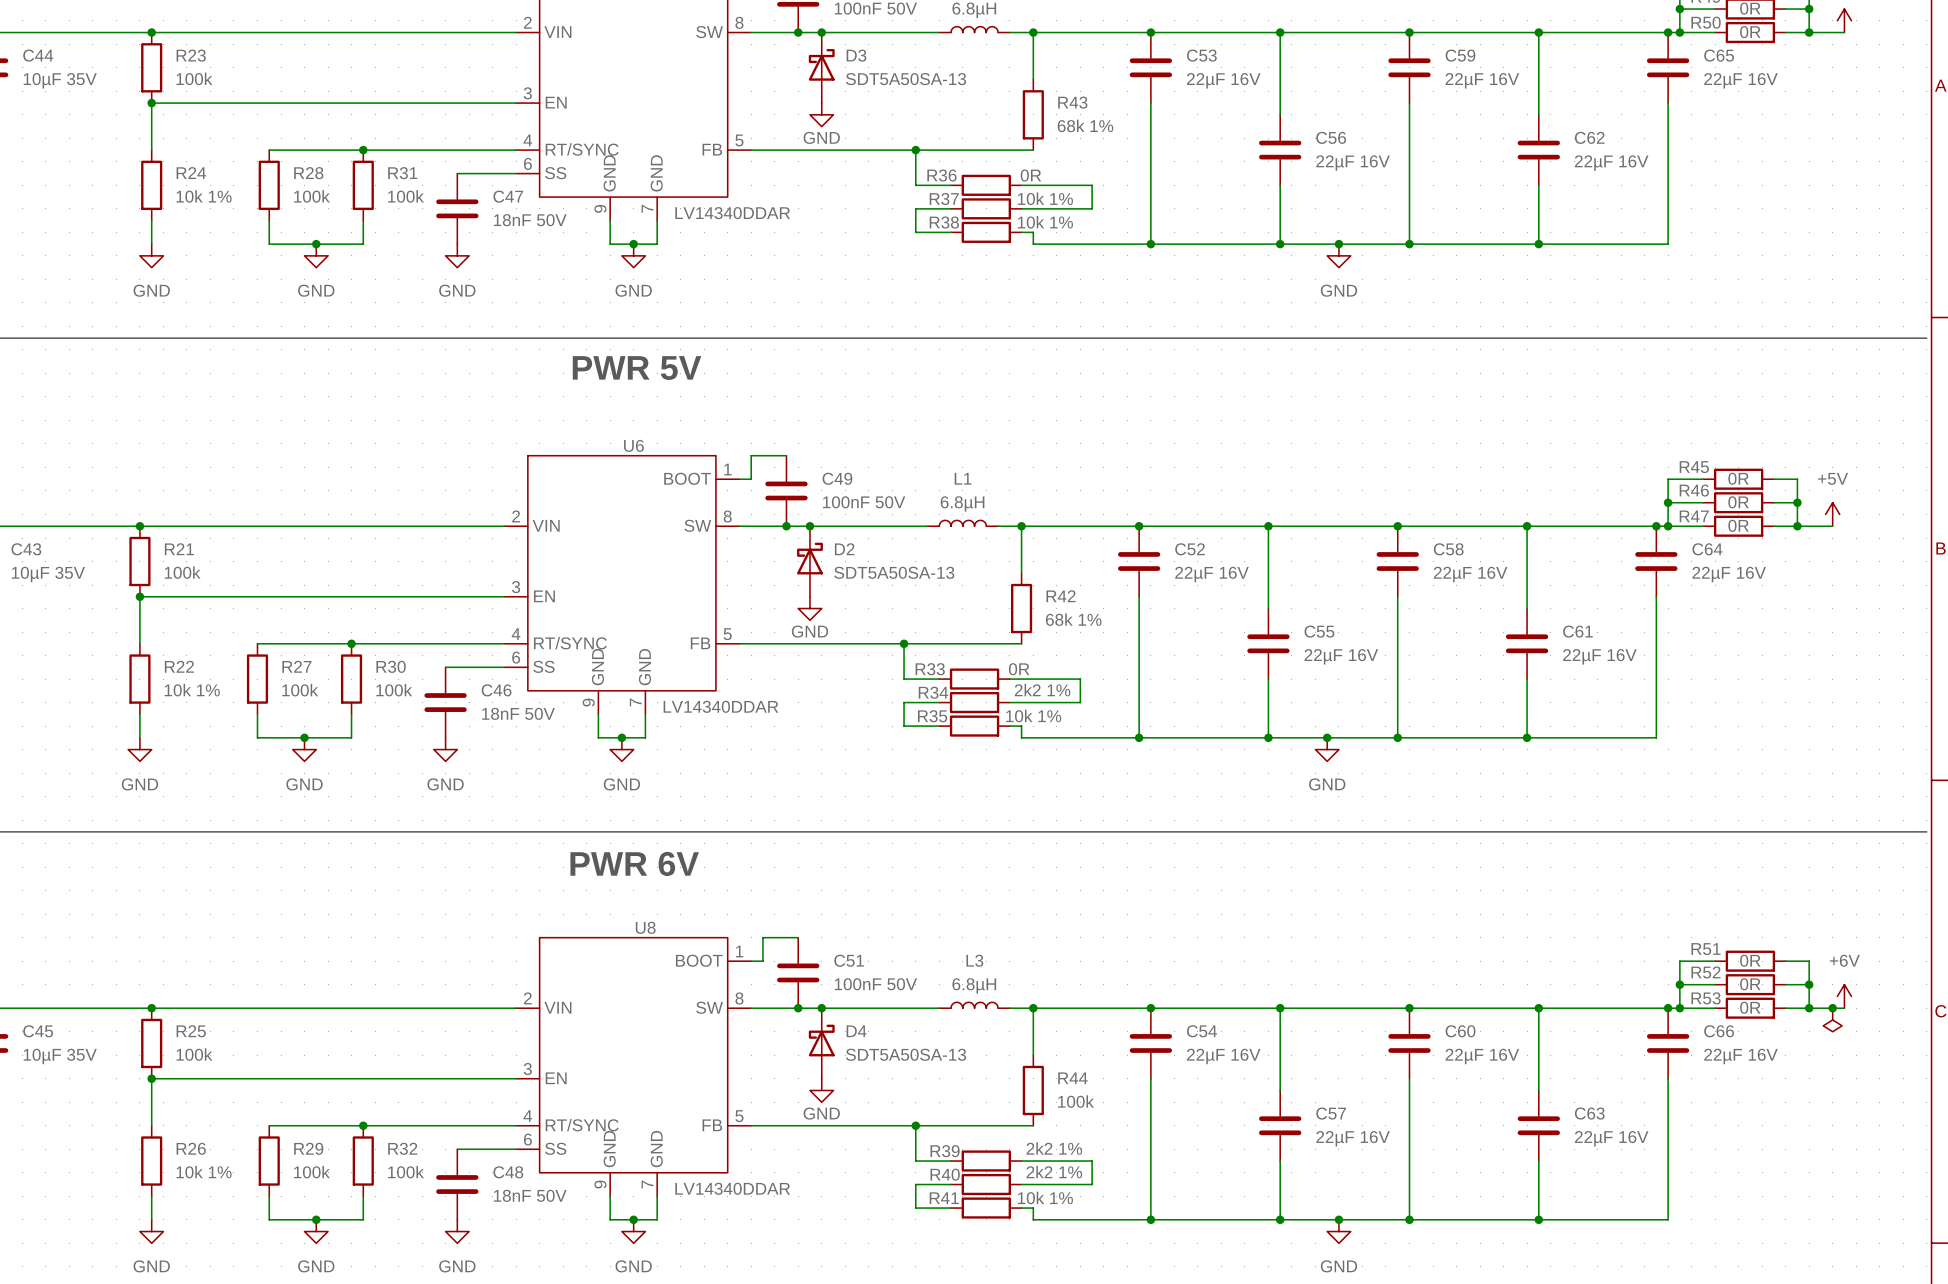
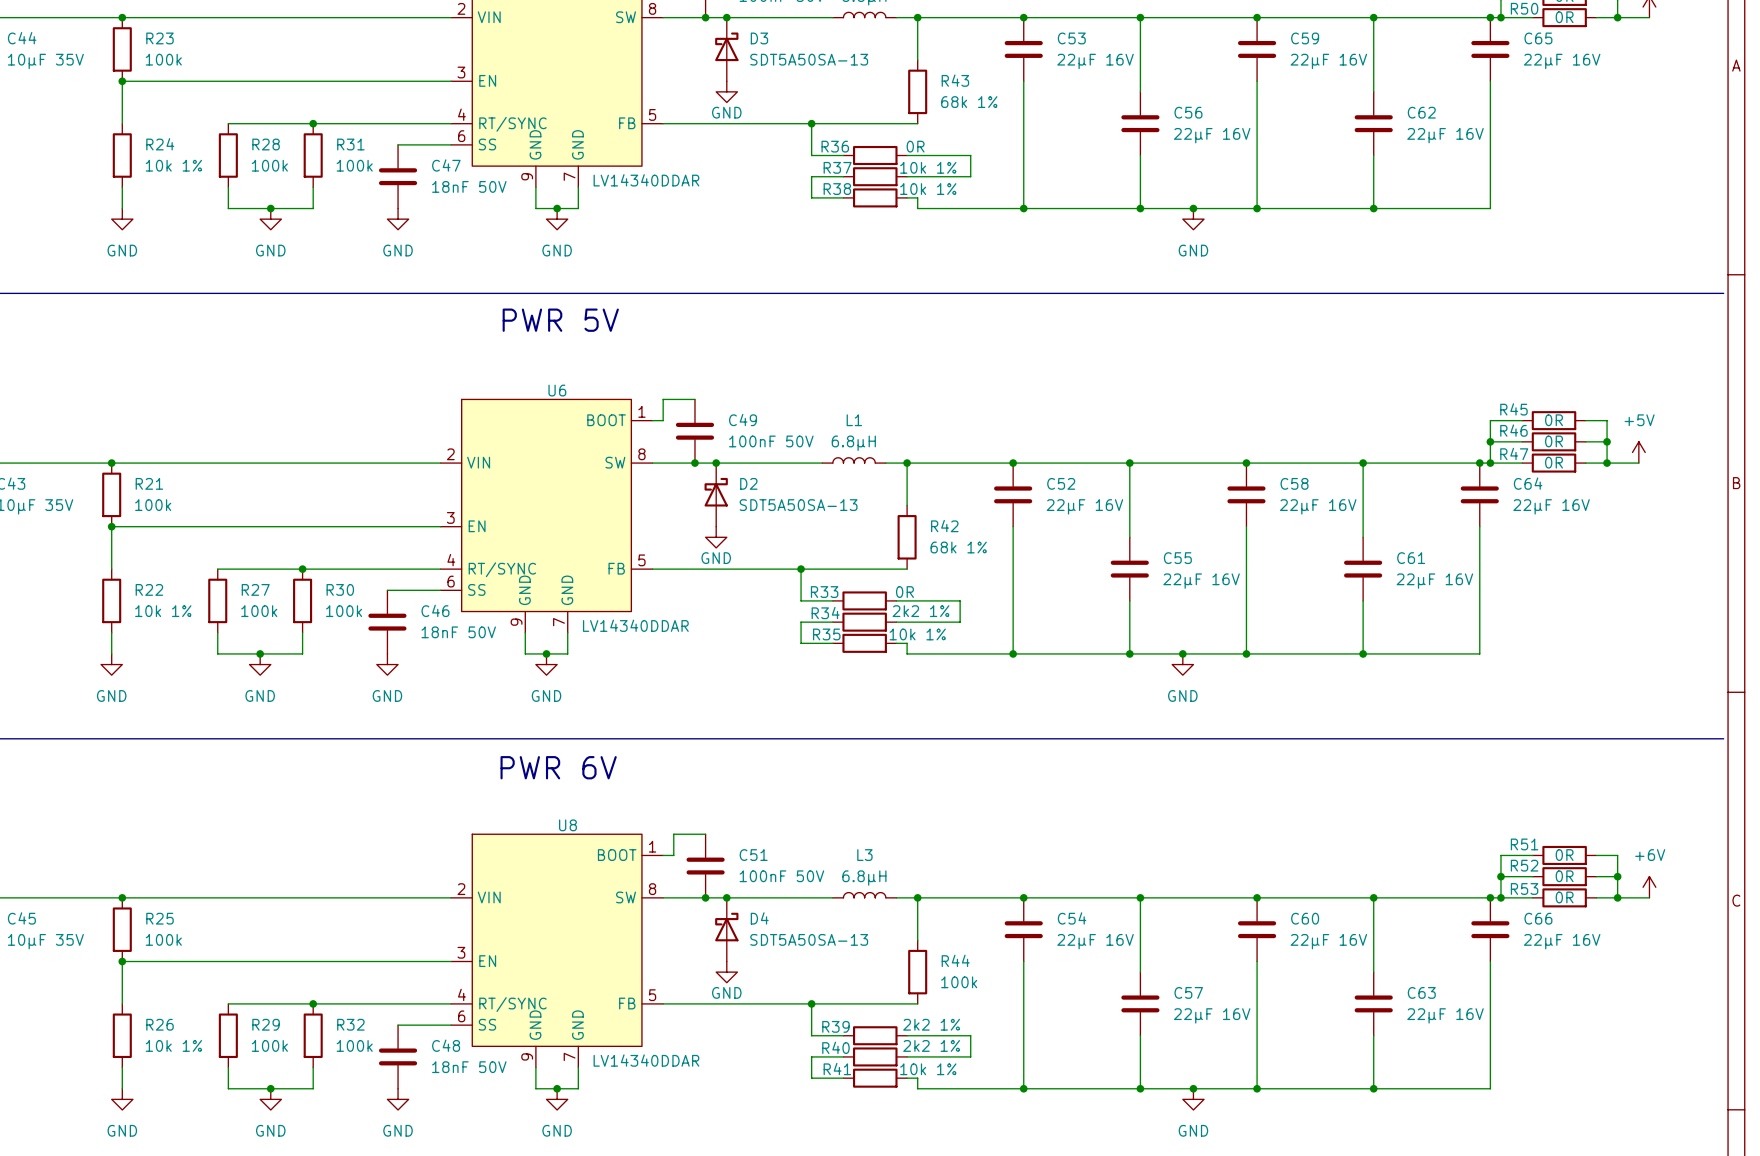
junction: (1832, 1008) -> none
power symbol: (1832, 1019) -> none

